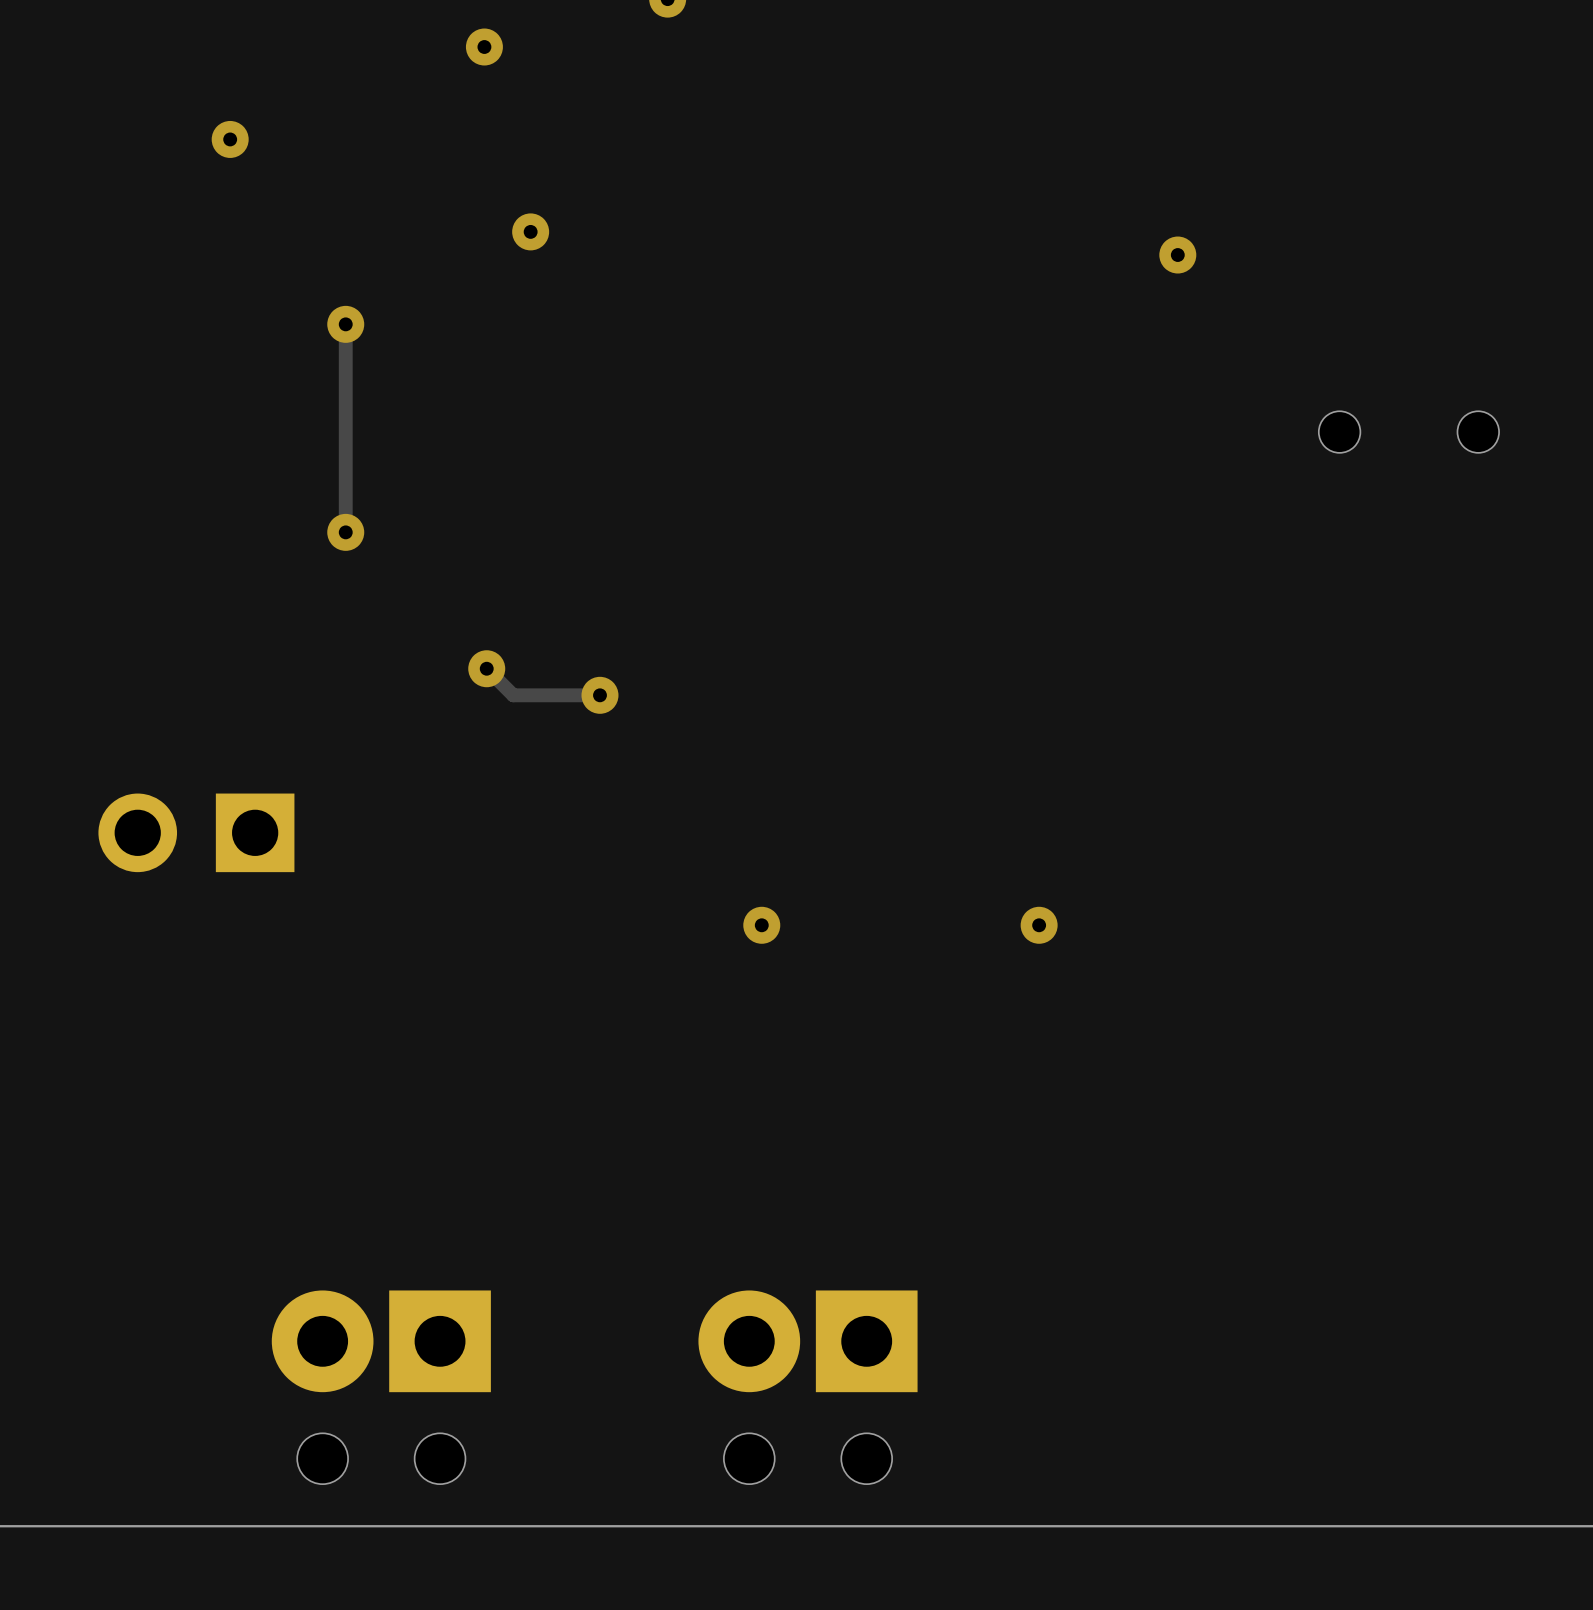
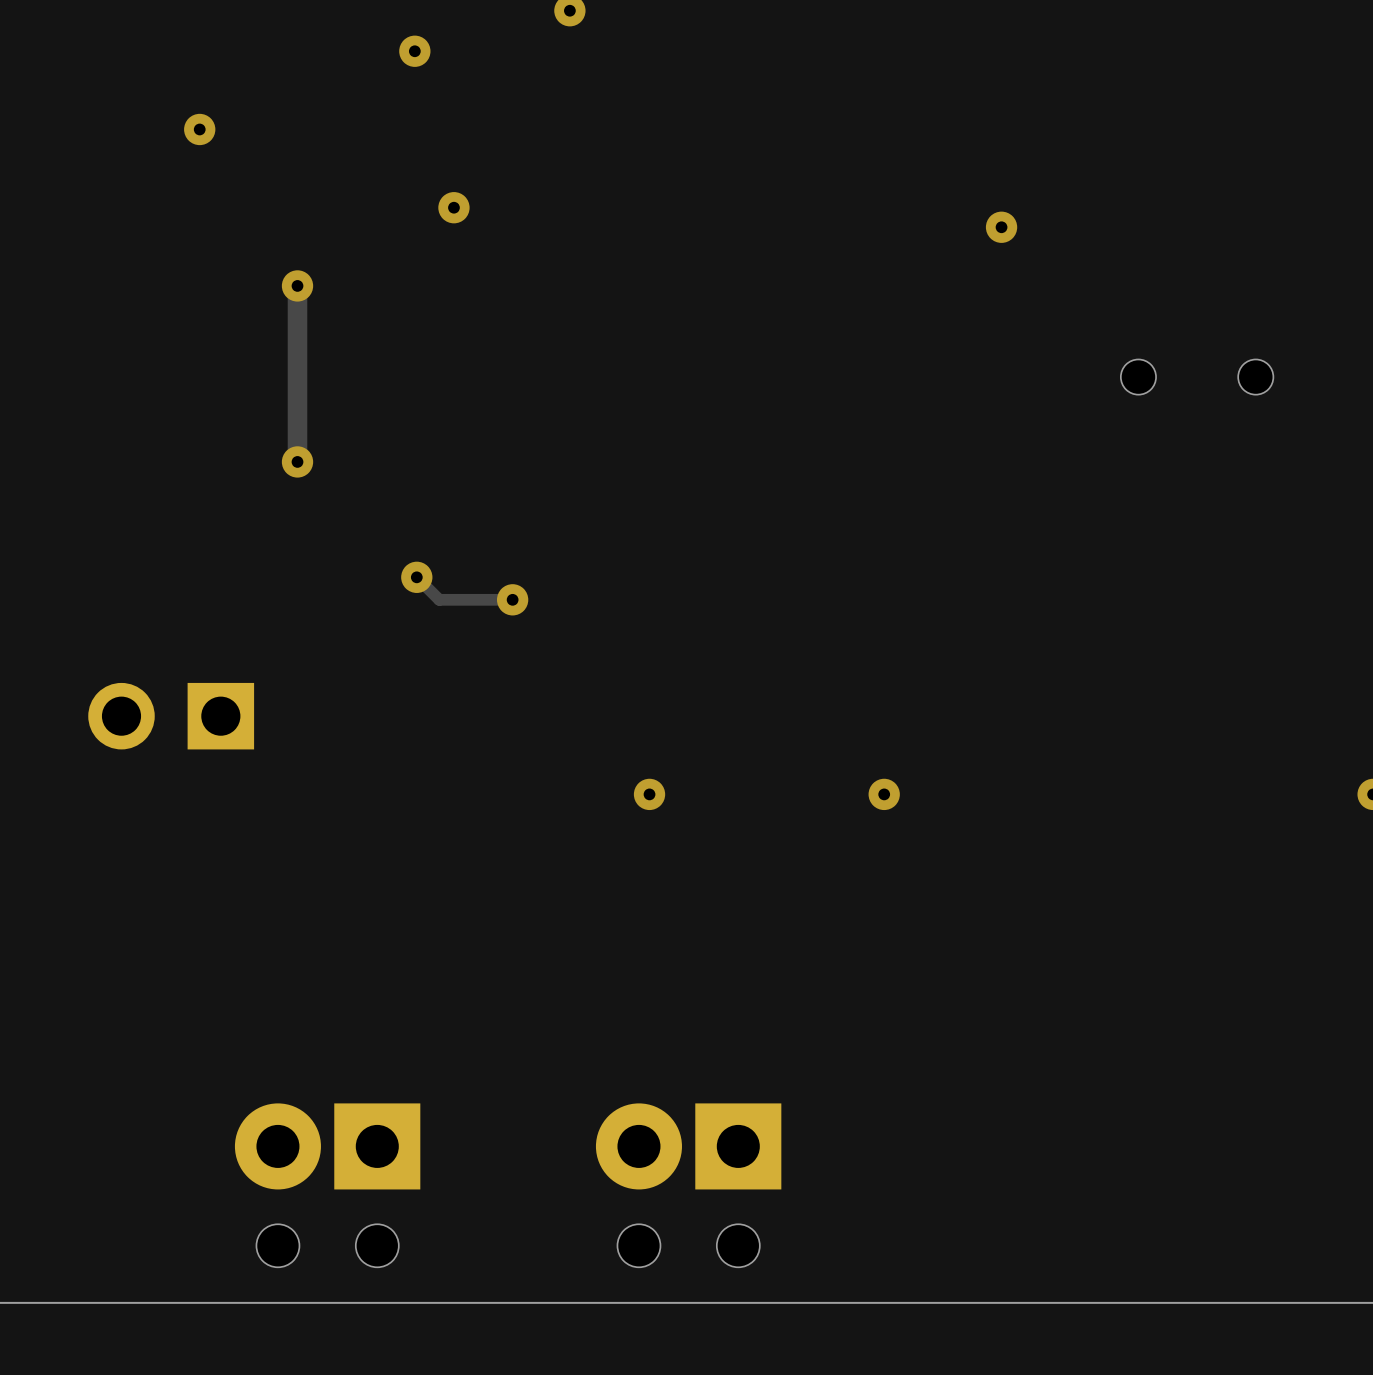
track width: thin (345, 324) (345, 532) -> thick (297, 285) (297, 461)

